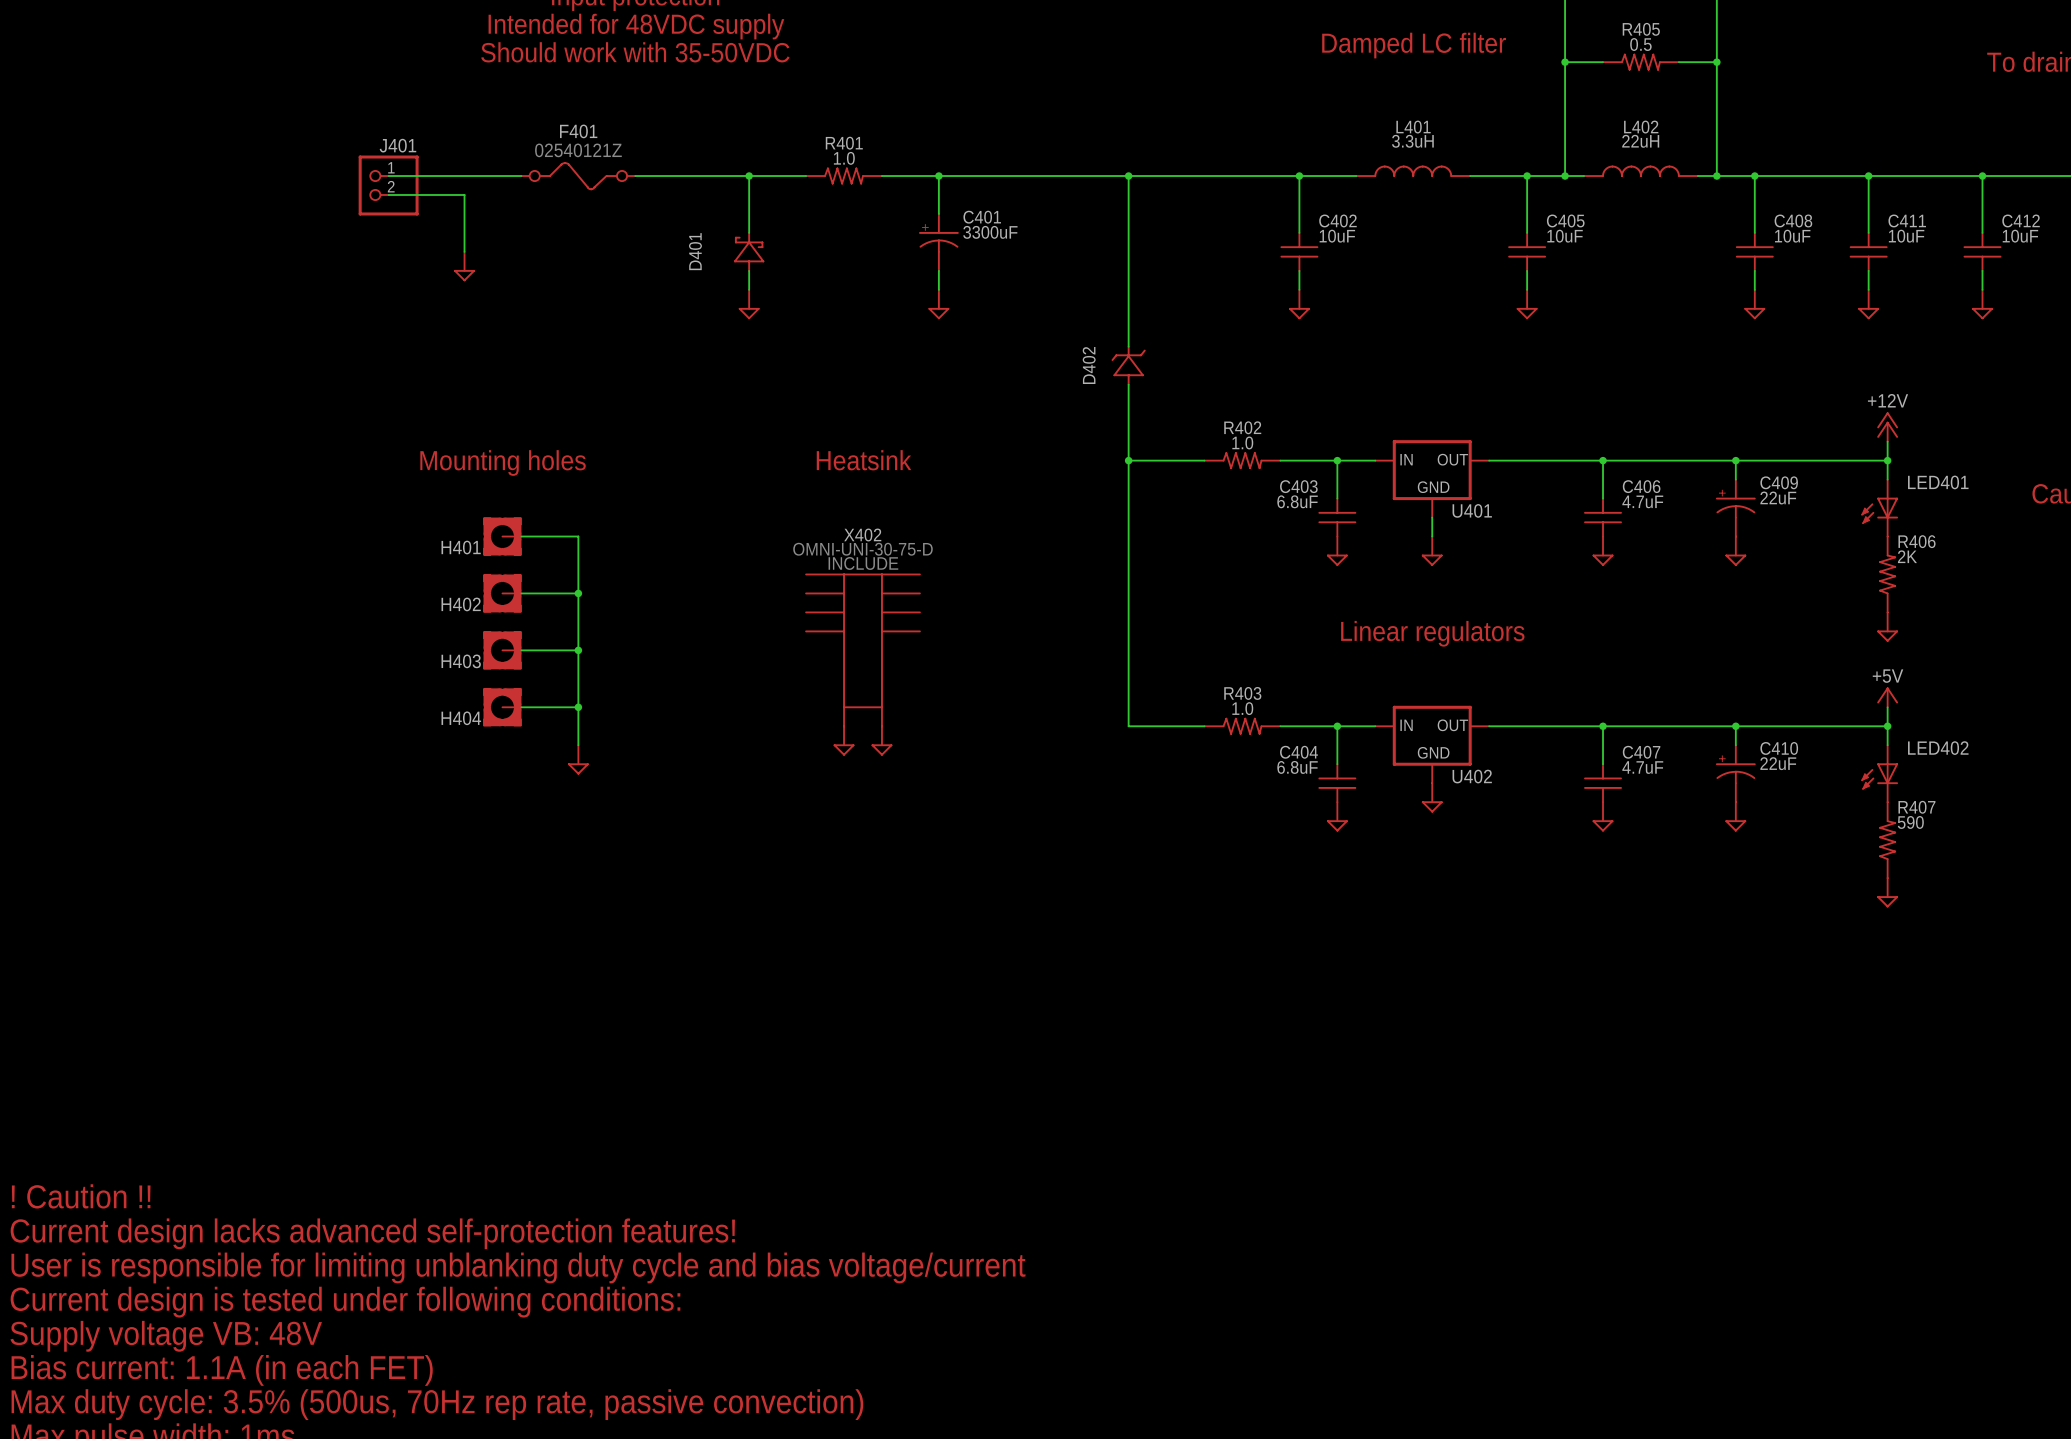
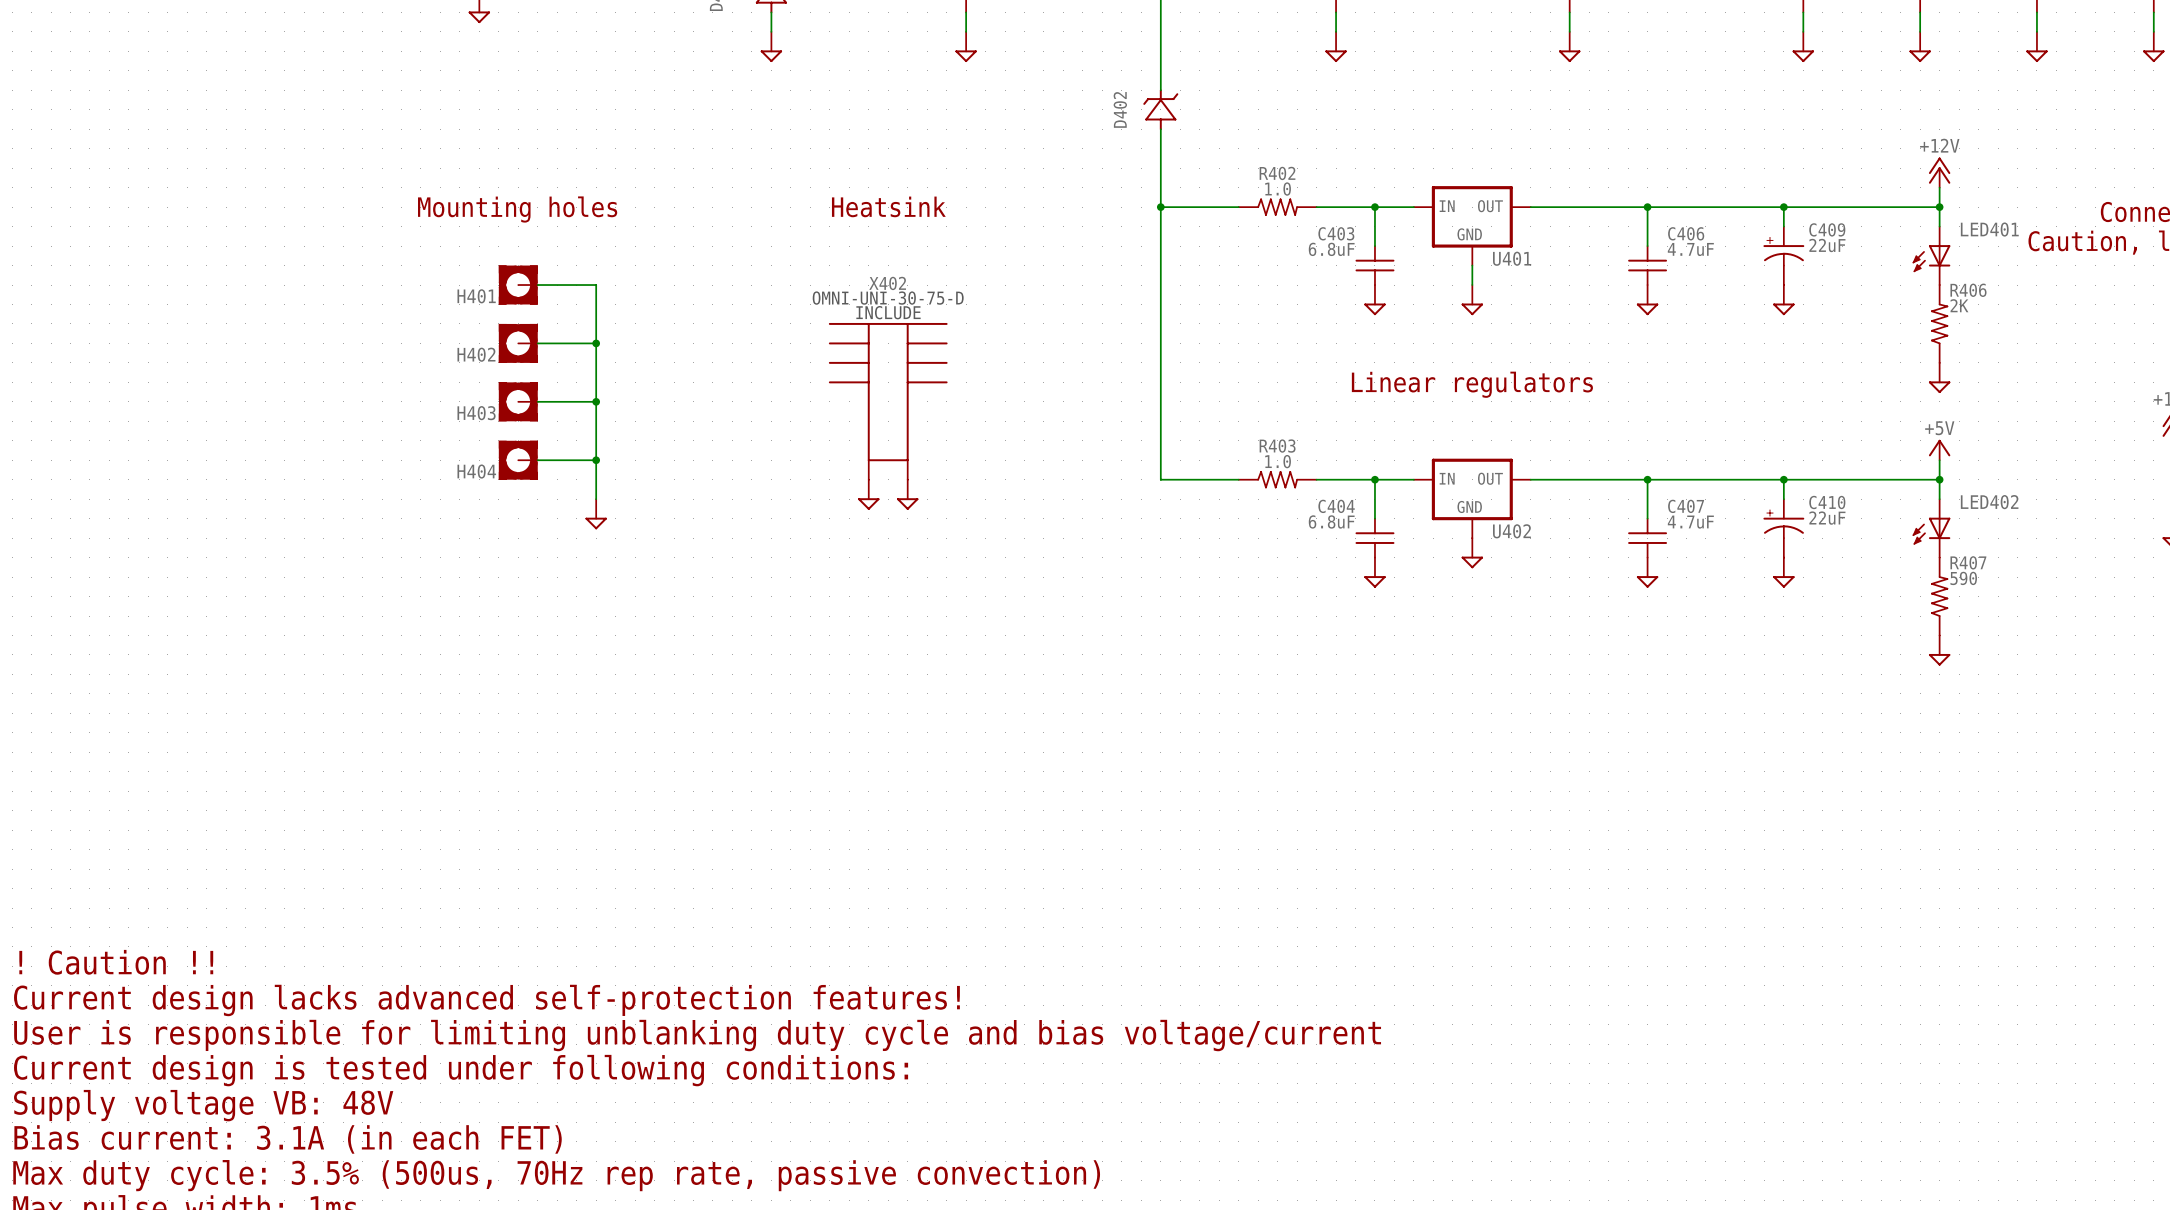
text: Bias current: 1.1A (in each FET) (222, 1370) -> Bias current: 3.1A (in each FET) (288, 1139)

